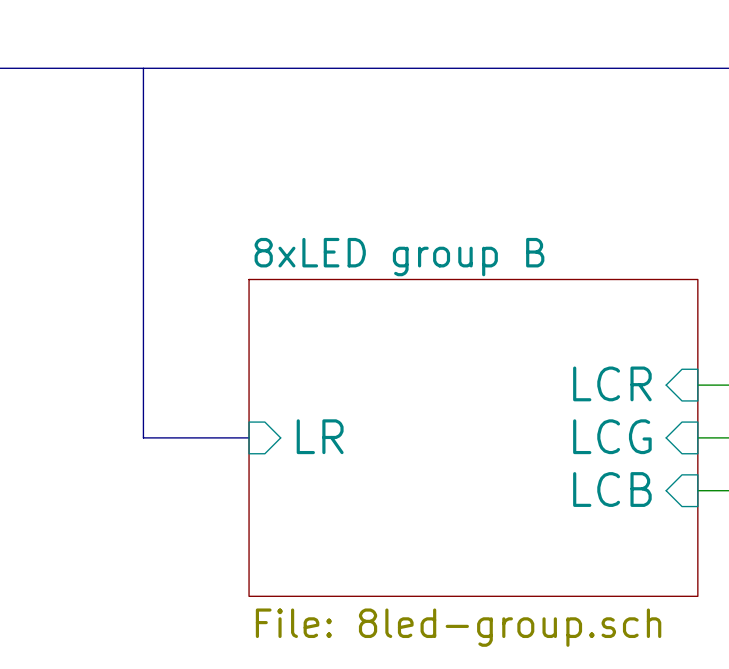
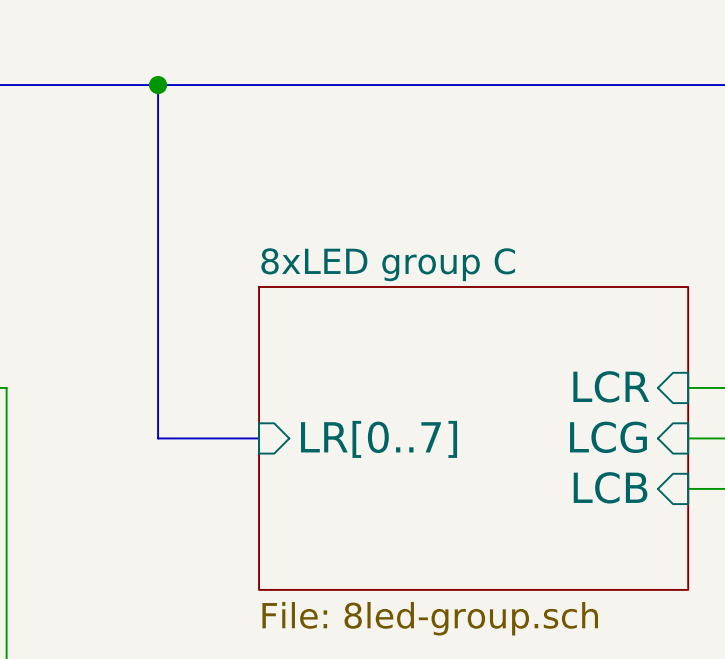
junction: none -> (158, 85)
sheet 8xLED group B name: 8xLED group B (399, 257) -> 8xLED group C (388, 264)
sheet pin: LR (320, 436) -> LR[0..7] (379, 439)

